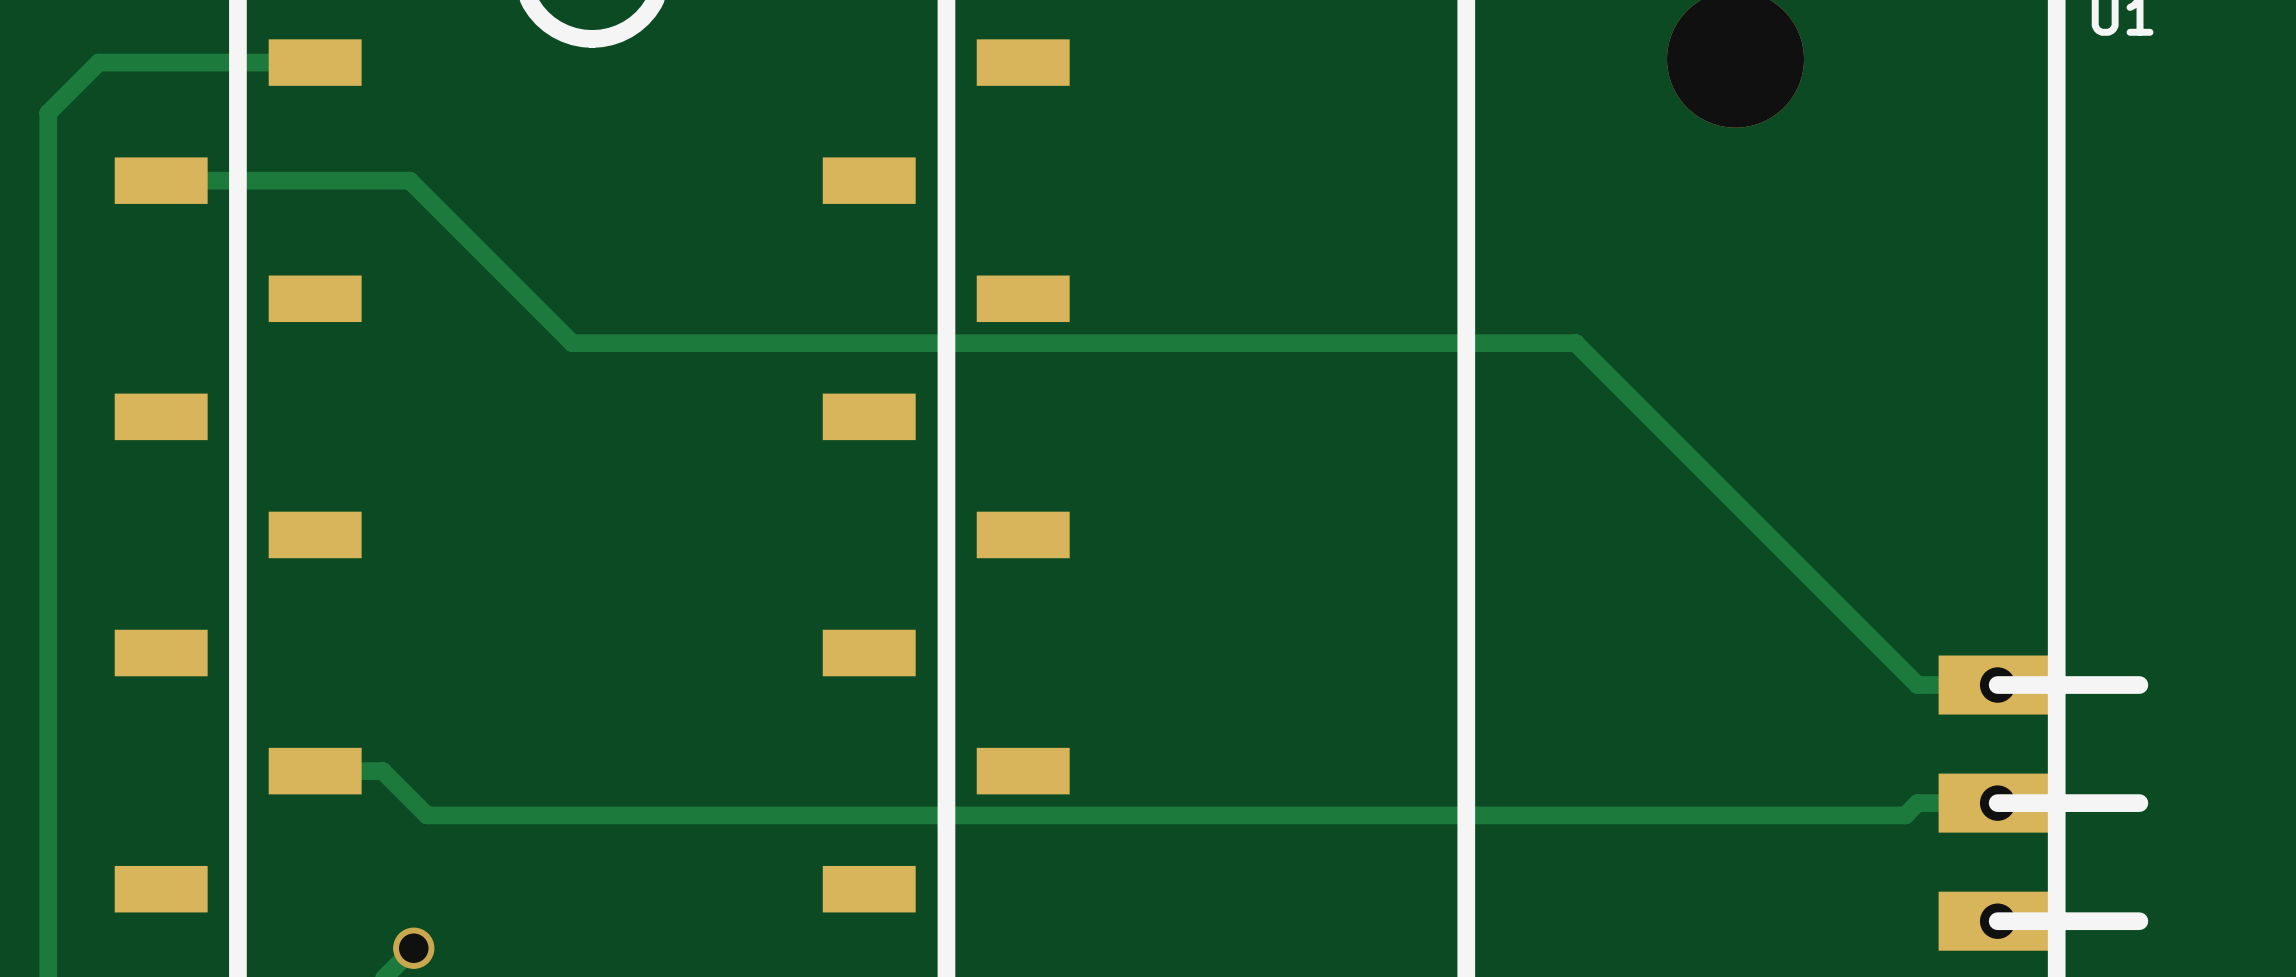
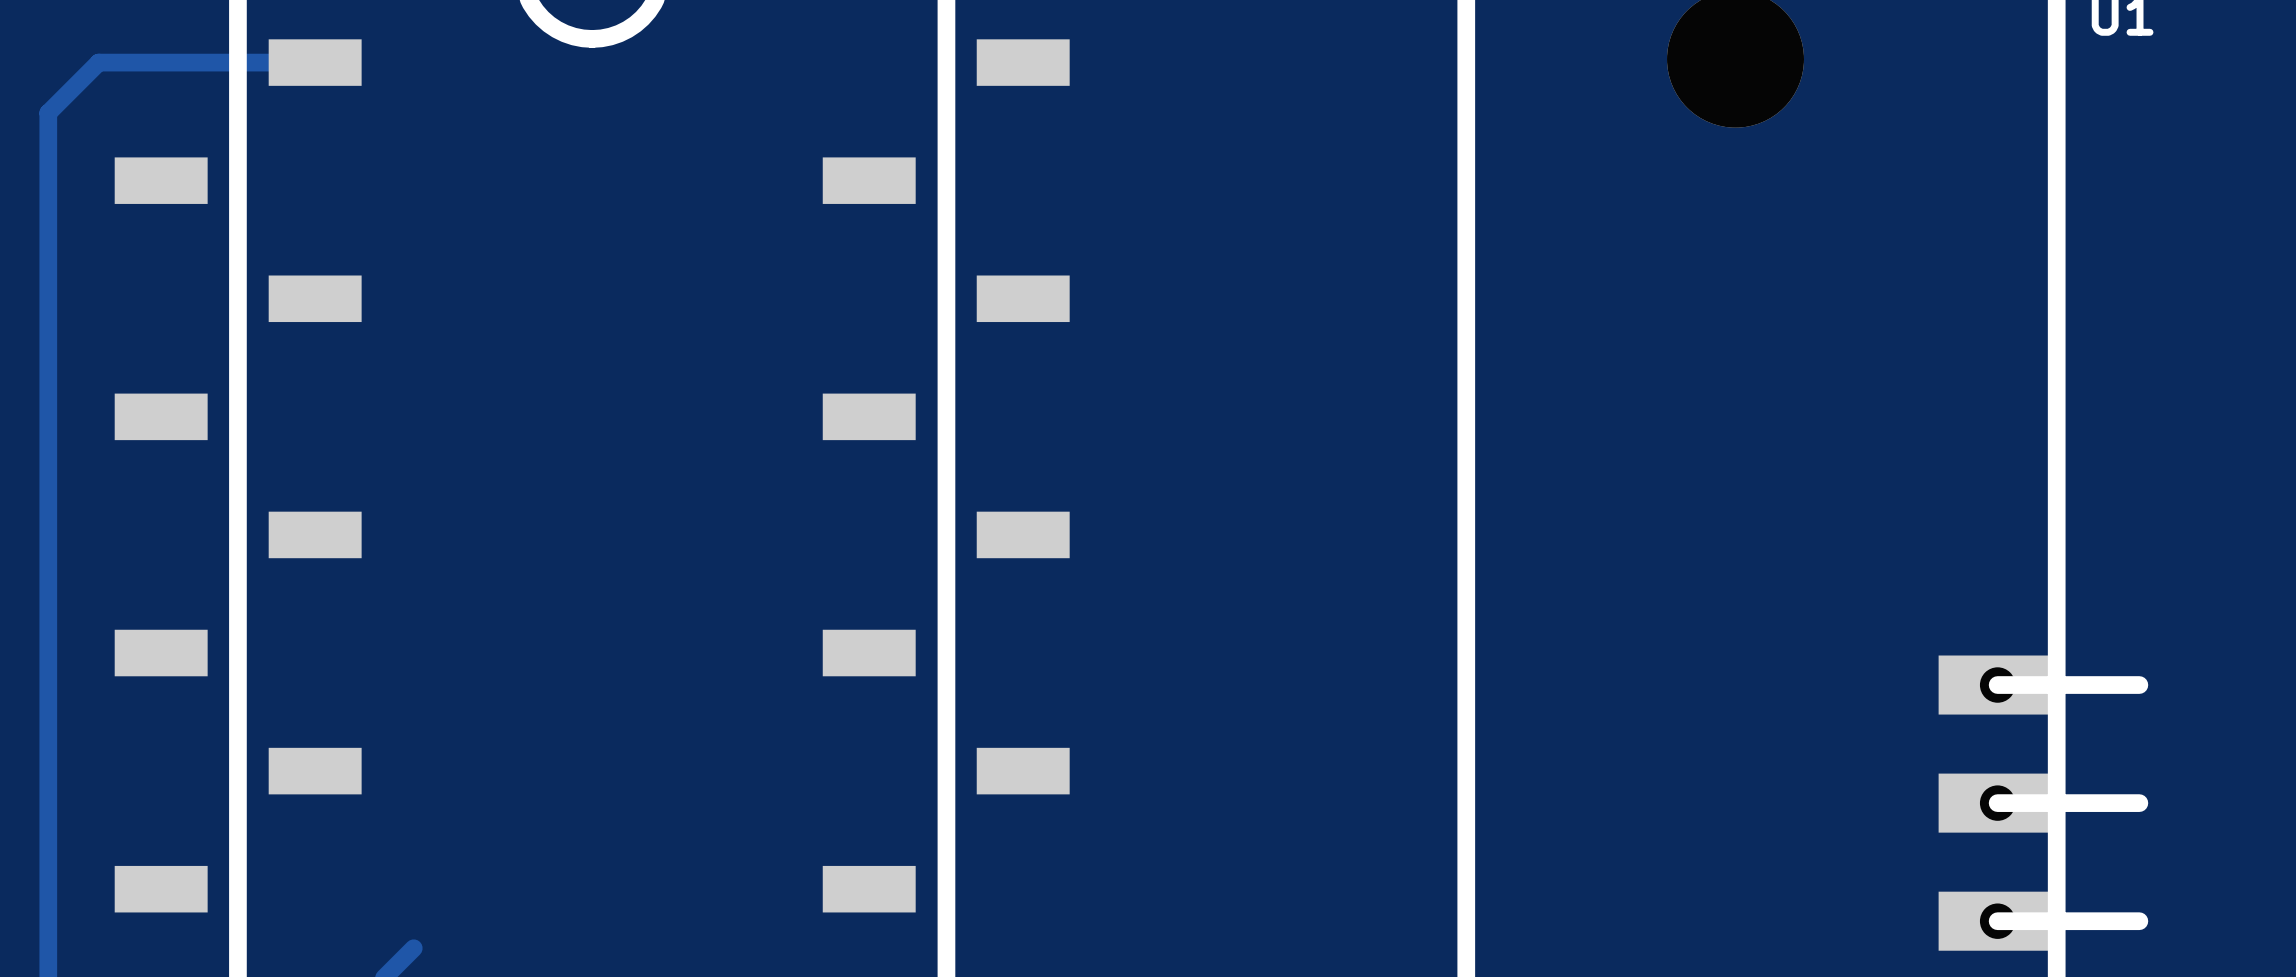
track: (161, 180) (409, 180) (572, 343) (1575, 343) (1917, 685) (1997, 685) -> none
track: (315, 771) (382, 771) (426, 815) (1905, 815) (1917, 803) (1997, 803) -> none
via: (413, 948) -> none

